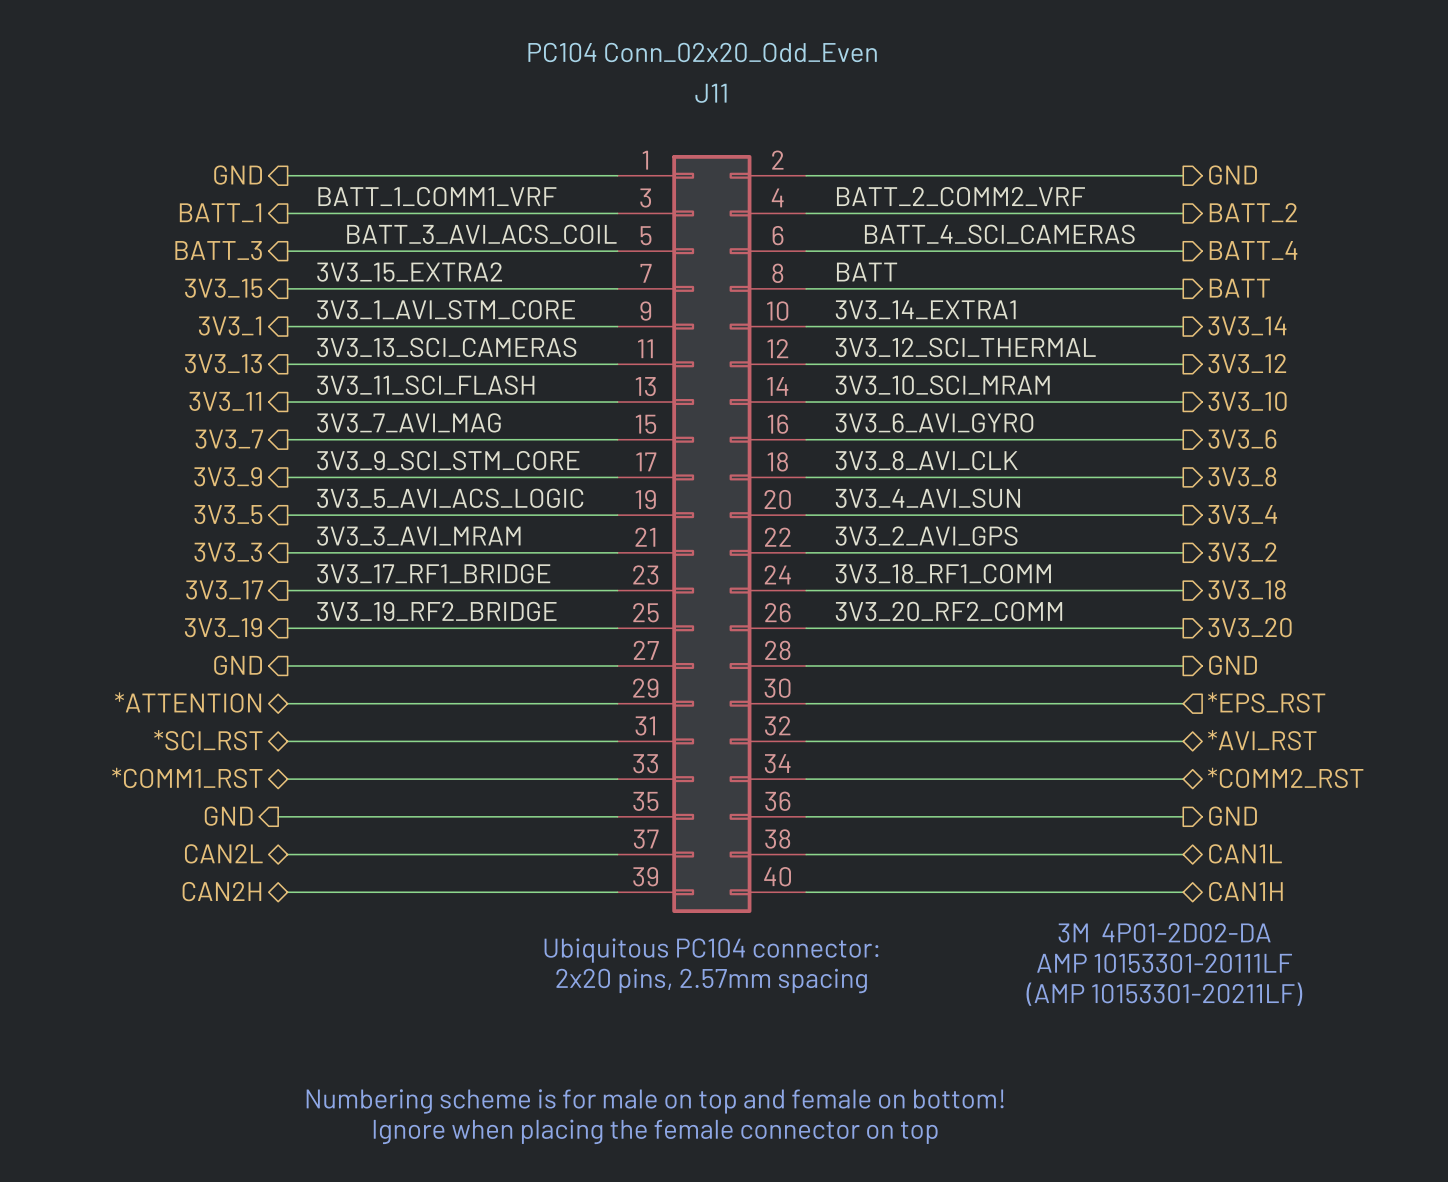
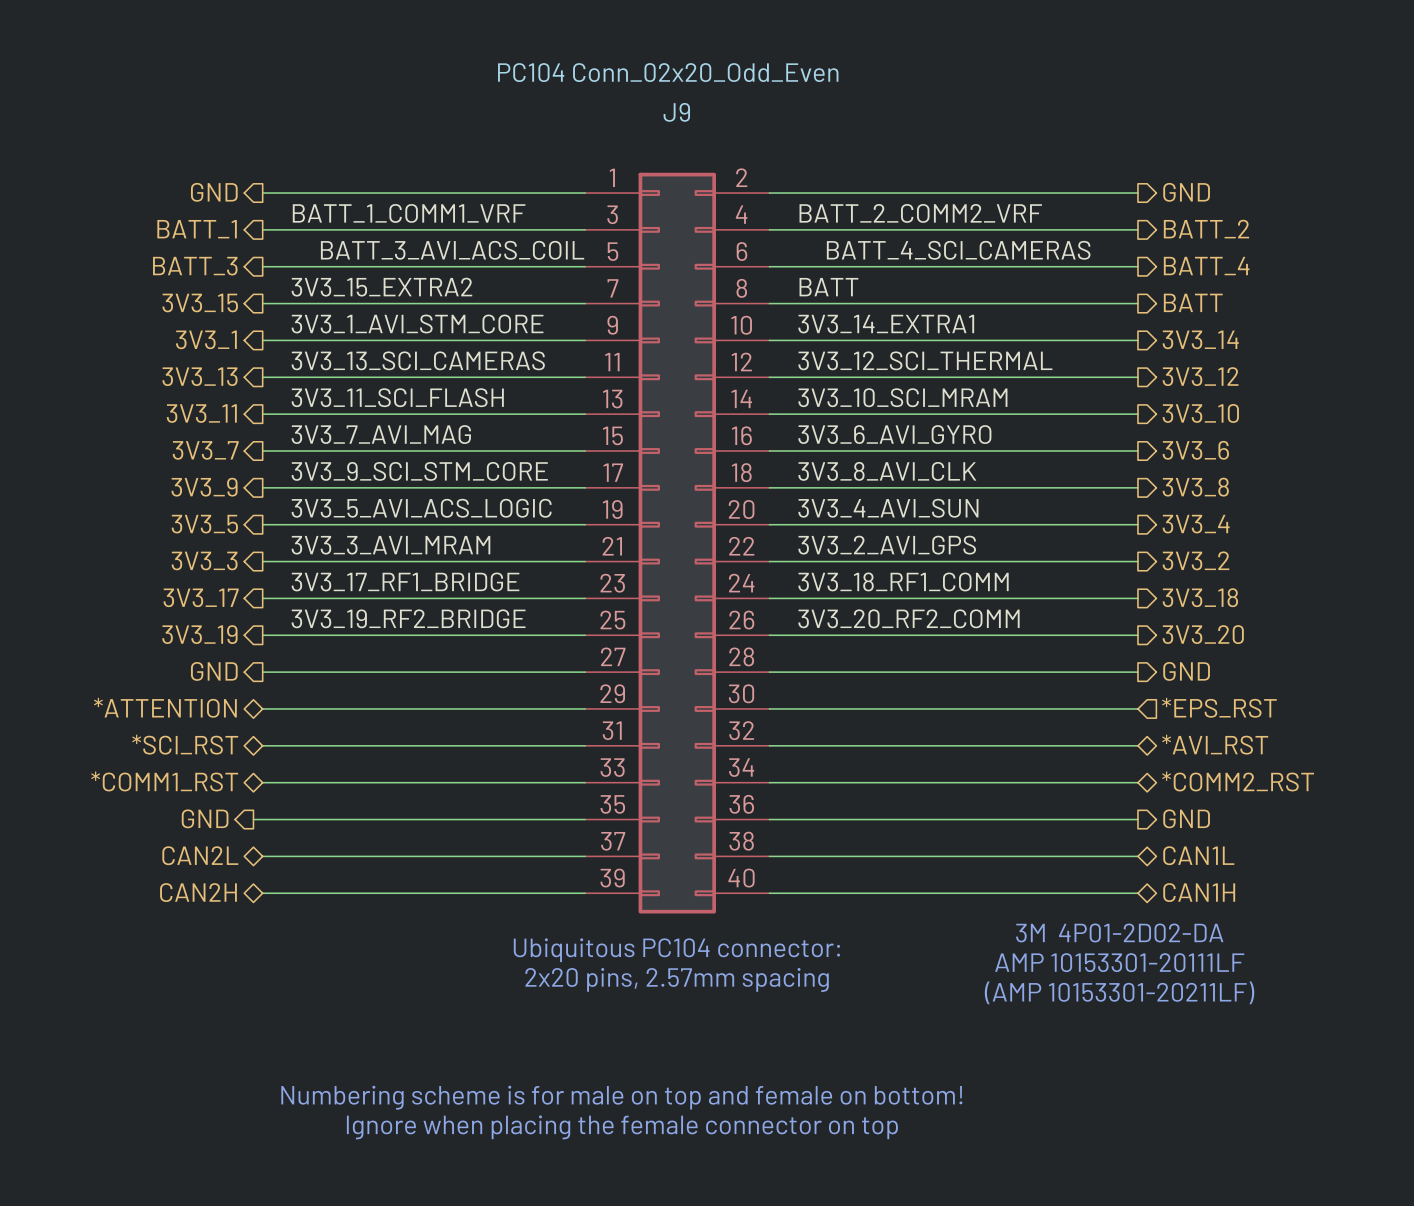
J11 name: J11 (710, 93) -> J9 (676, 112)

